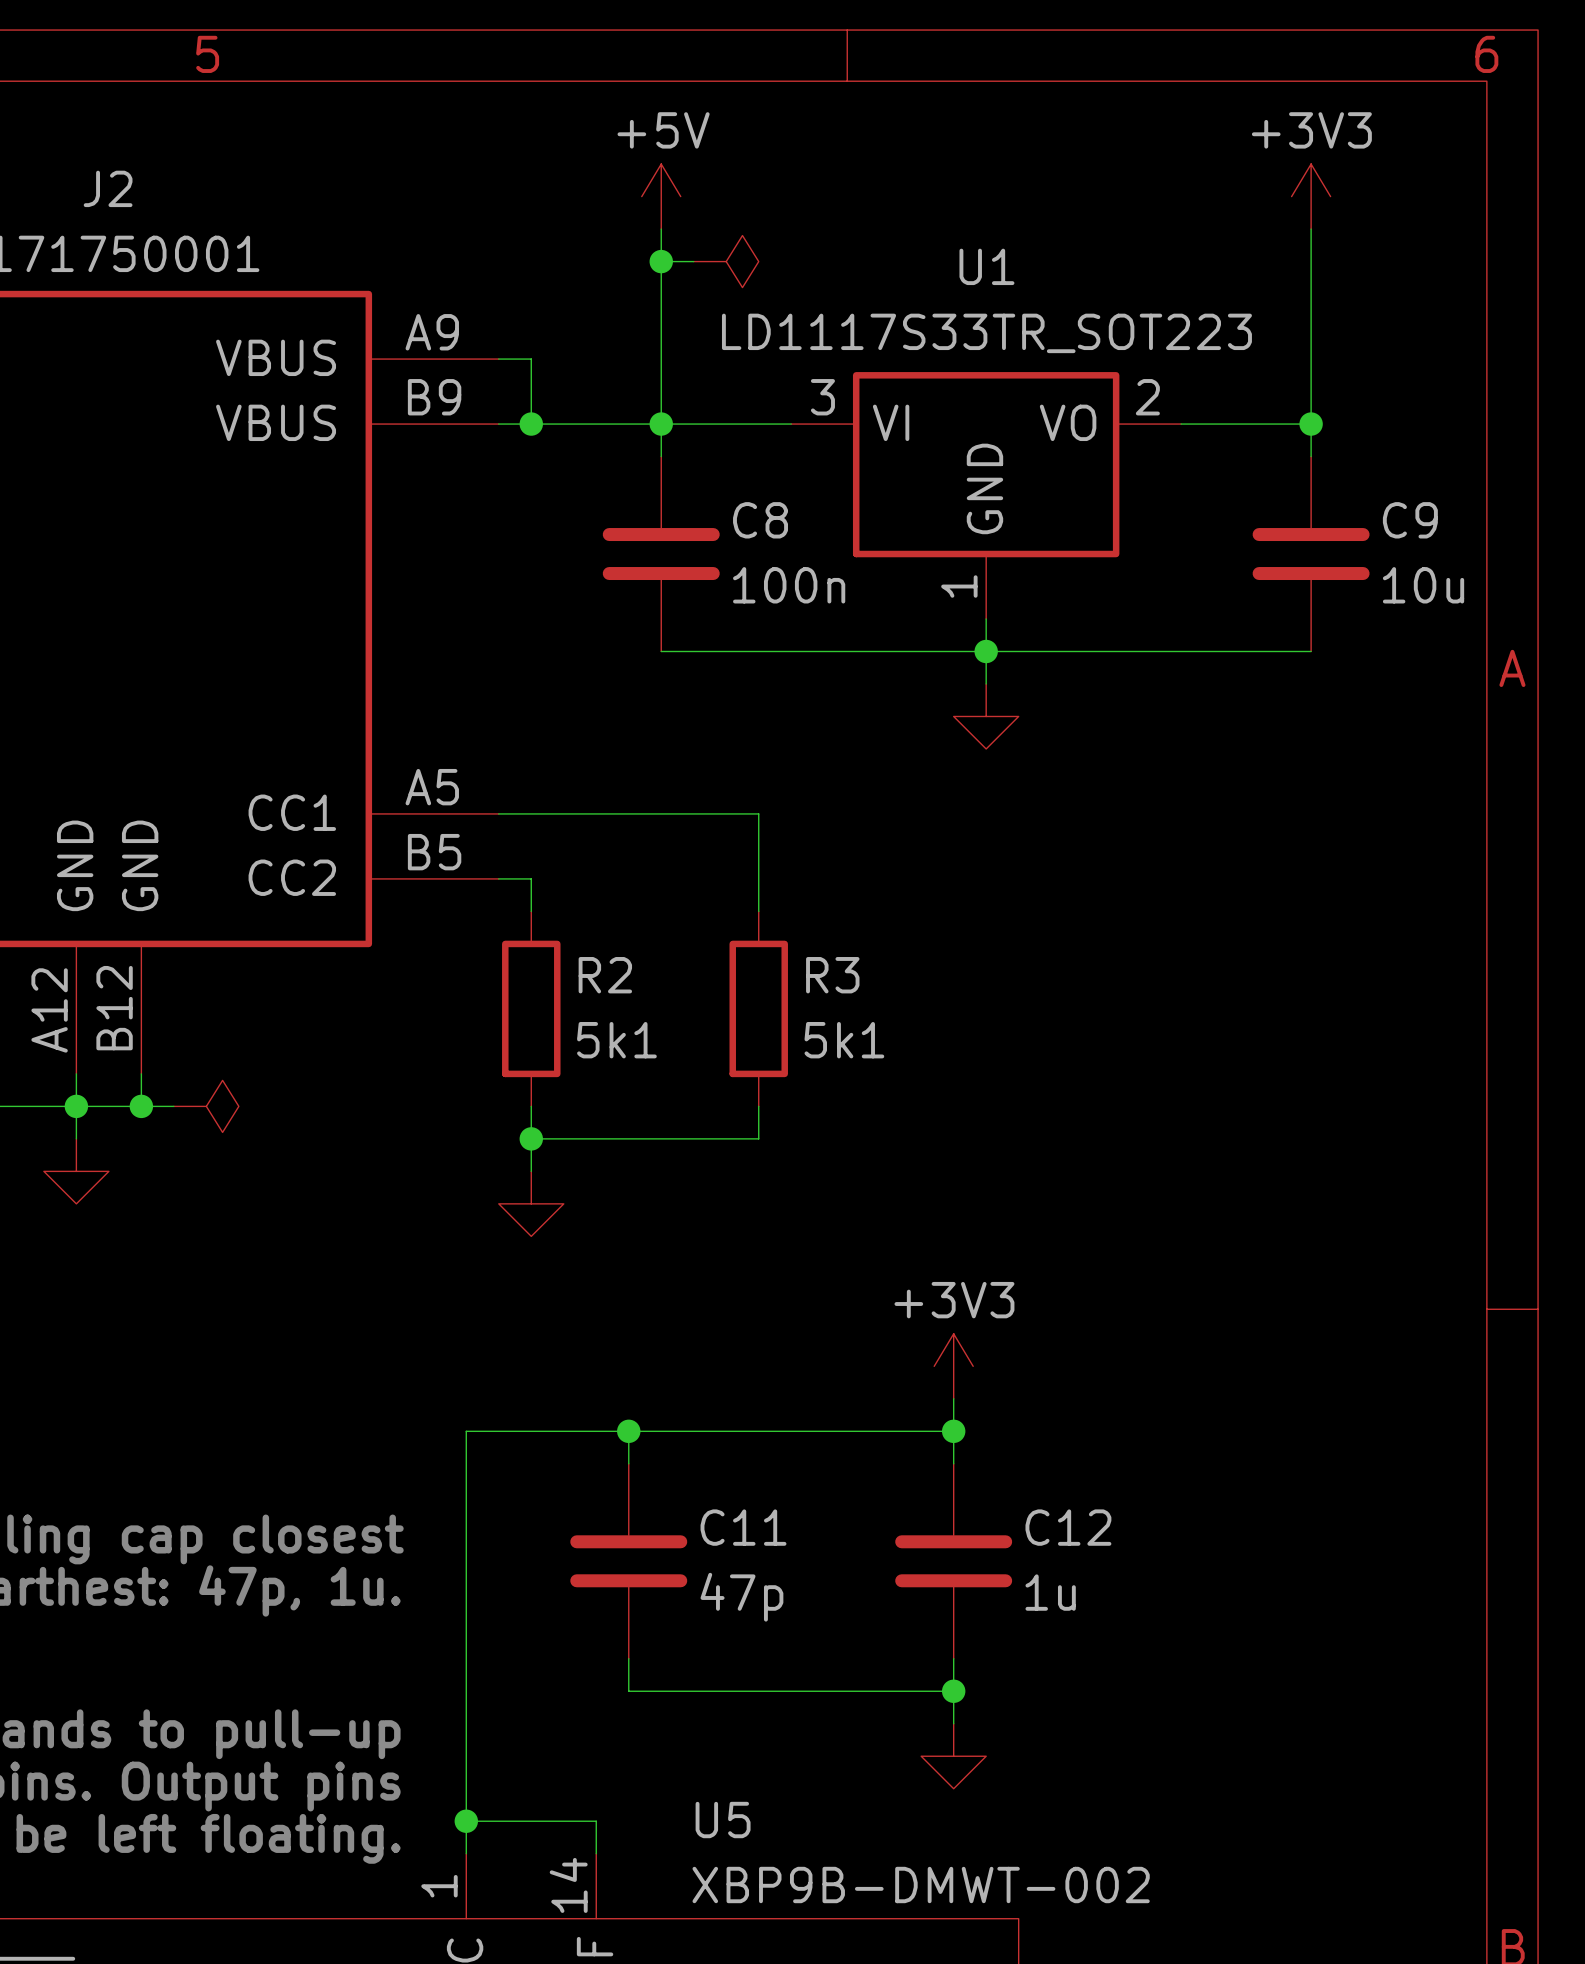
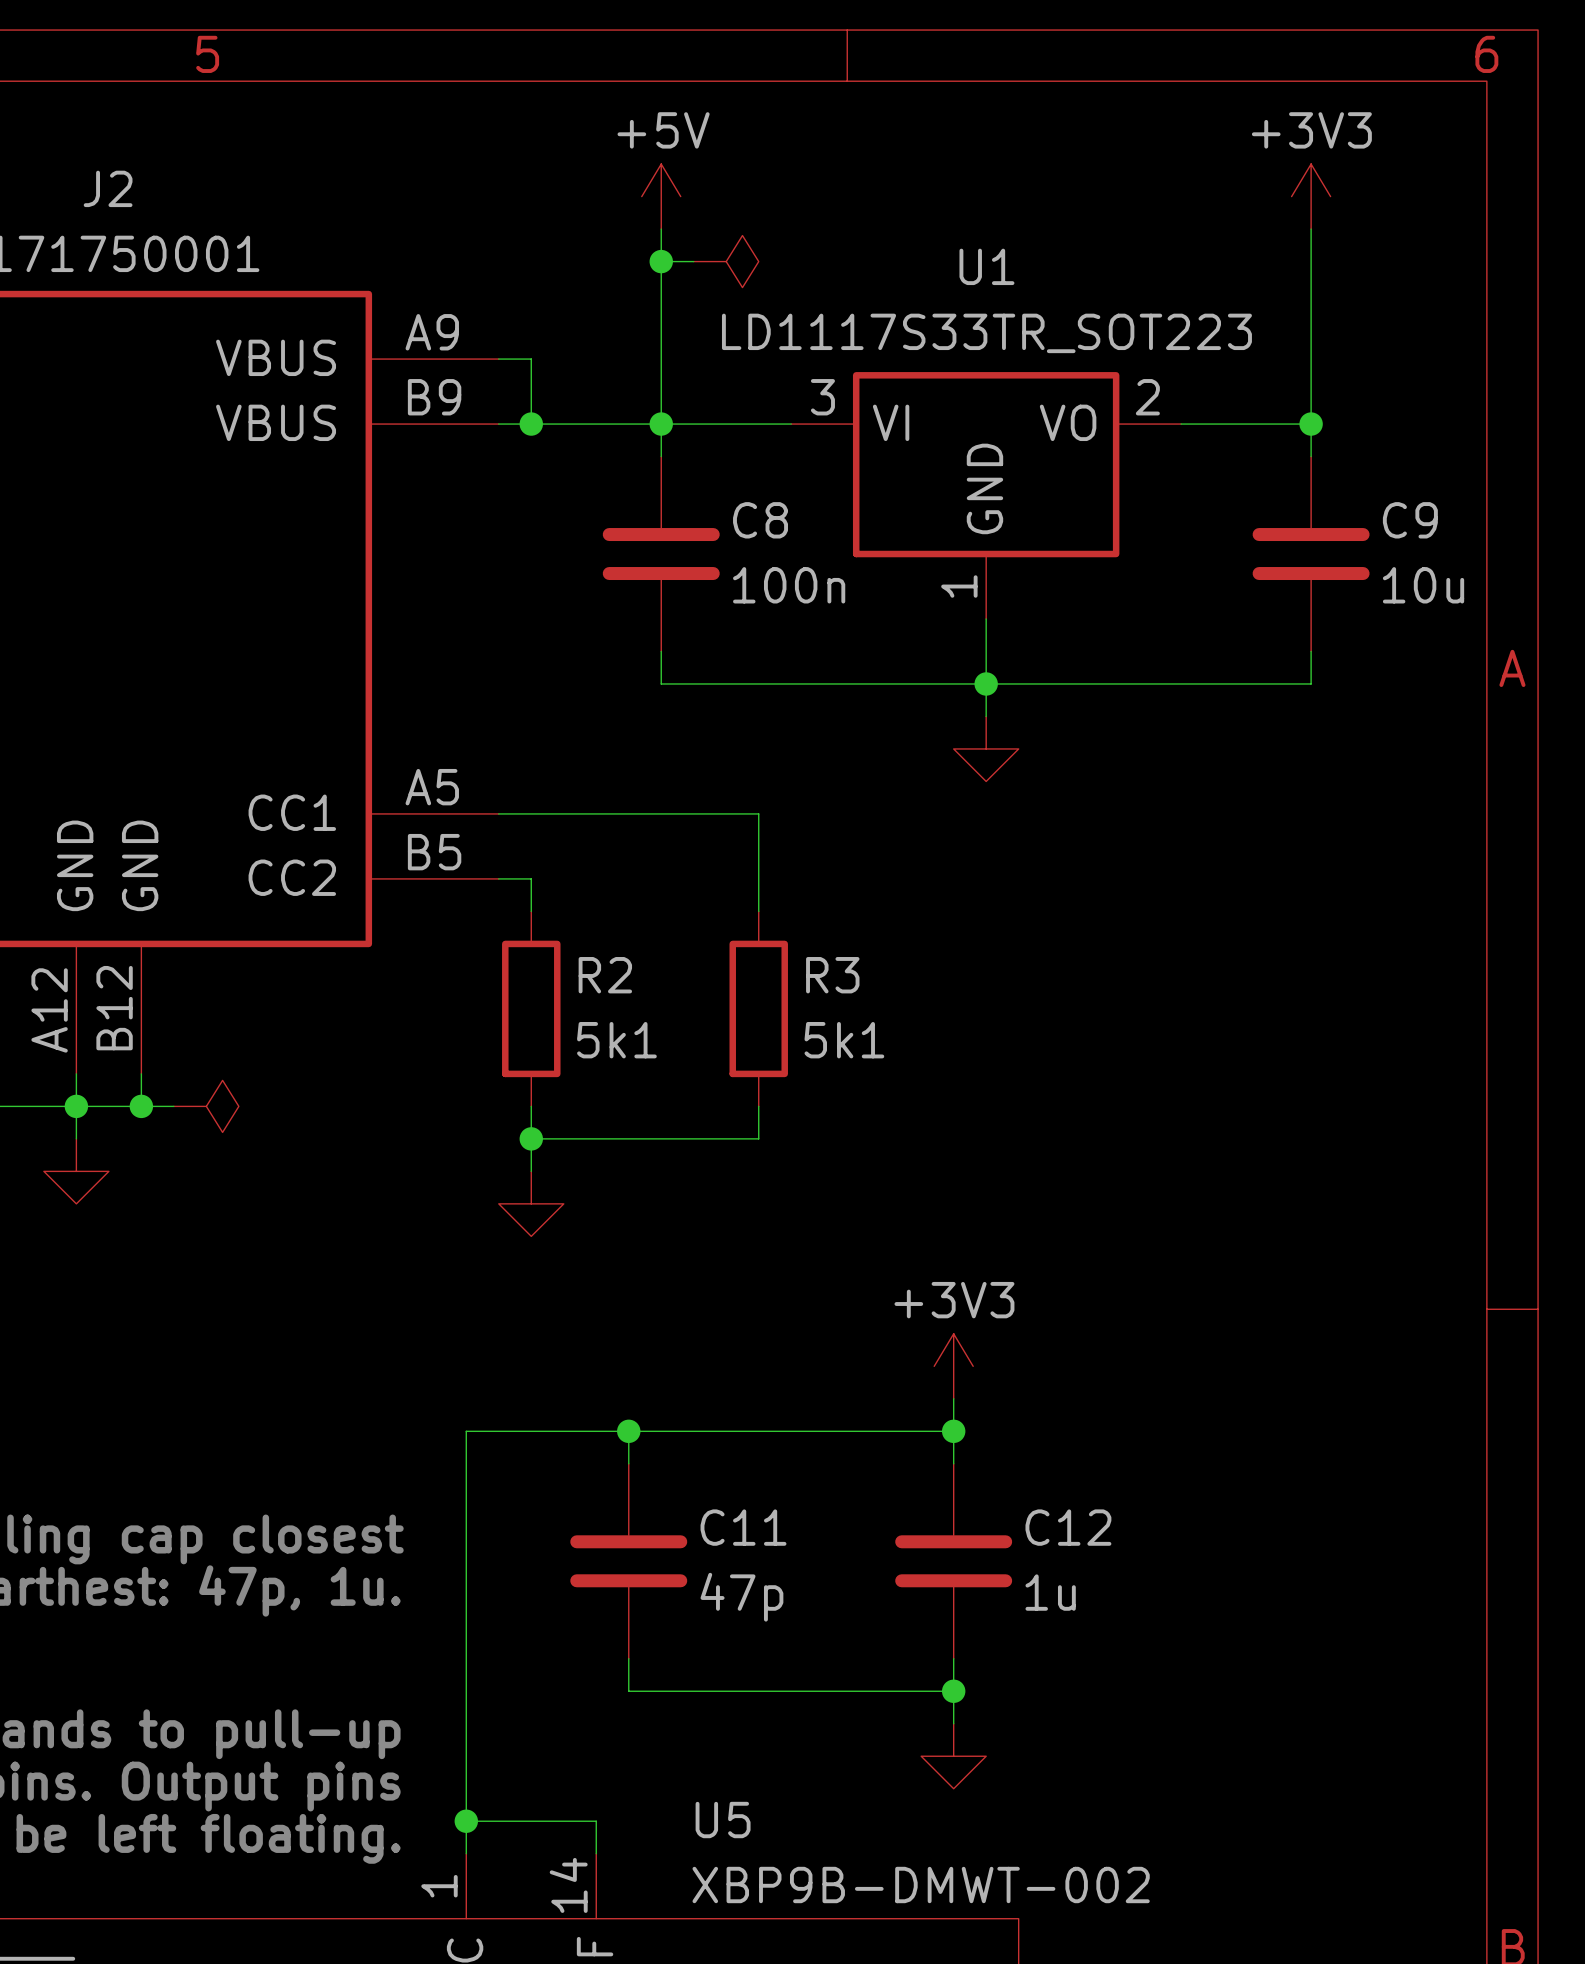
wire: (661, 651) (1311, 651) -> (661, 651) (661, 683) (1311, 683) (1311, 651)
junction position: (986, 651) -> (986, 683)
power symbol position: (986, 716) -> (986, 748)

